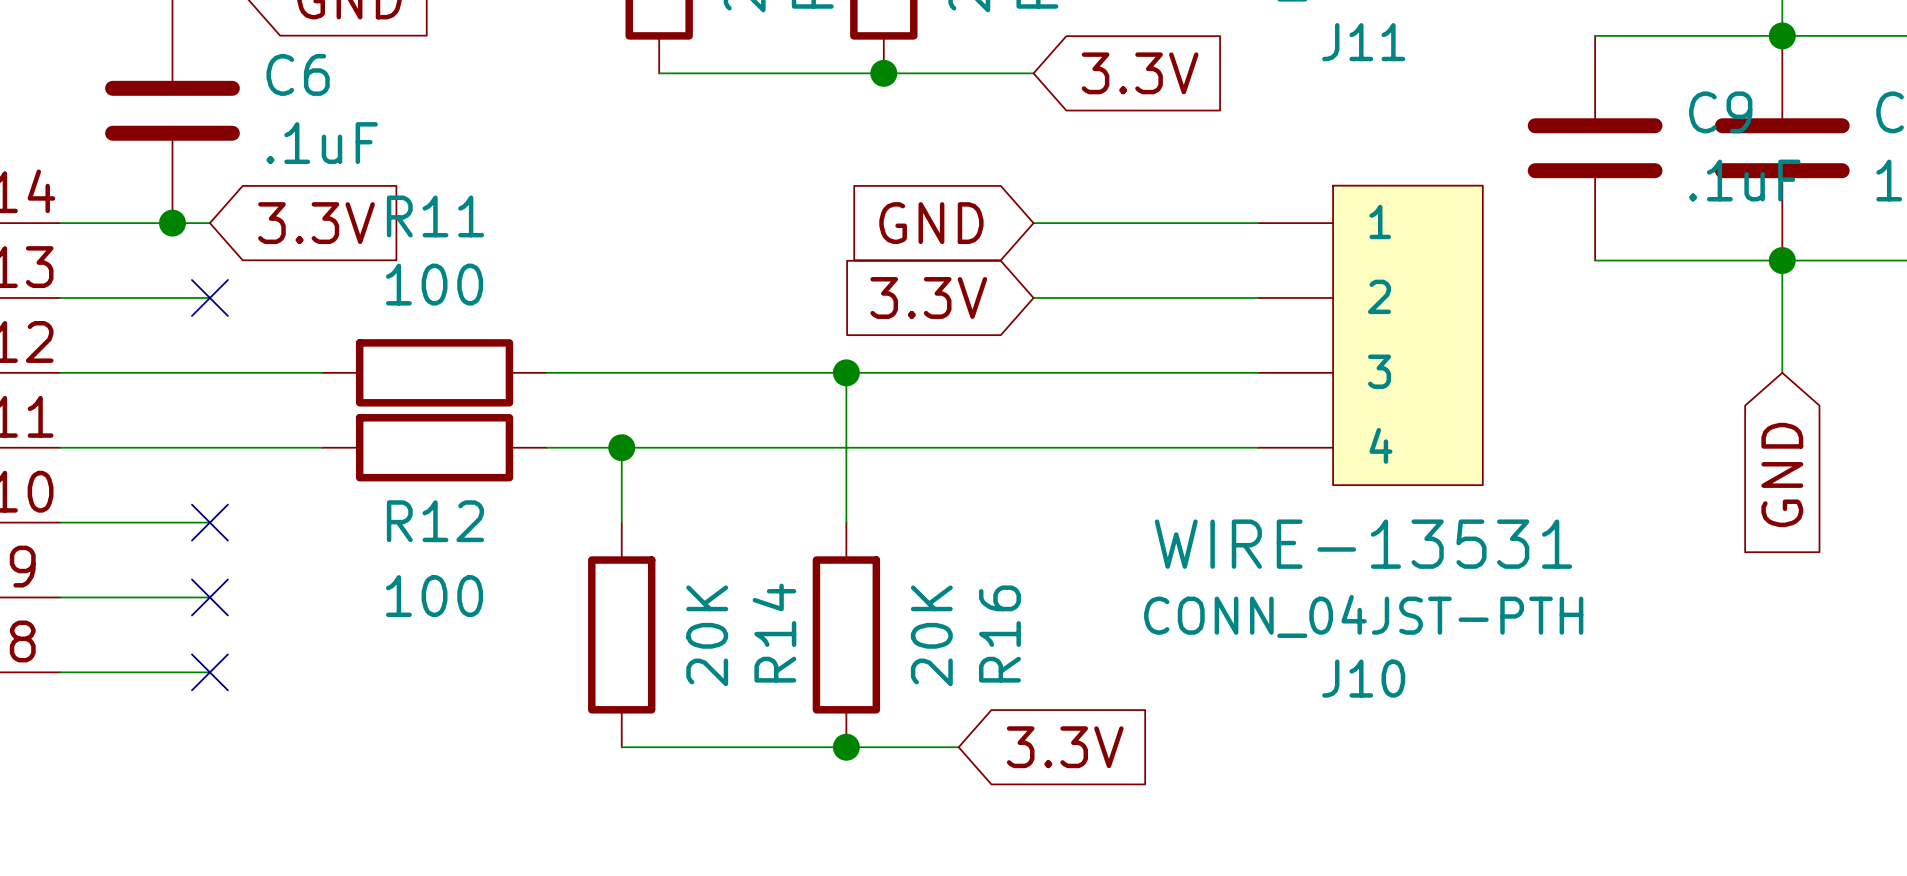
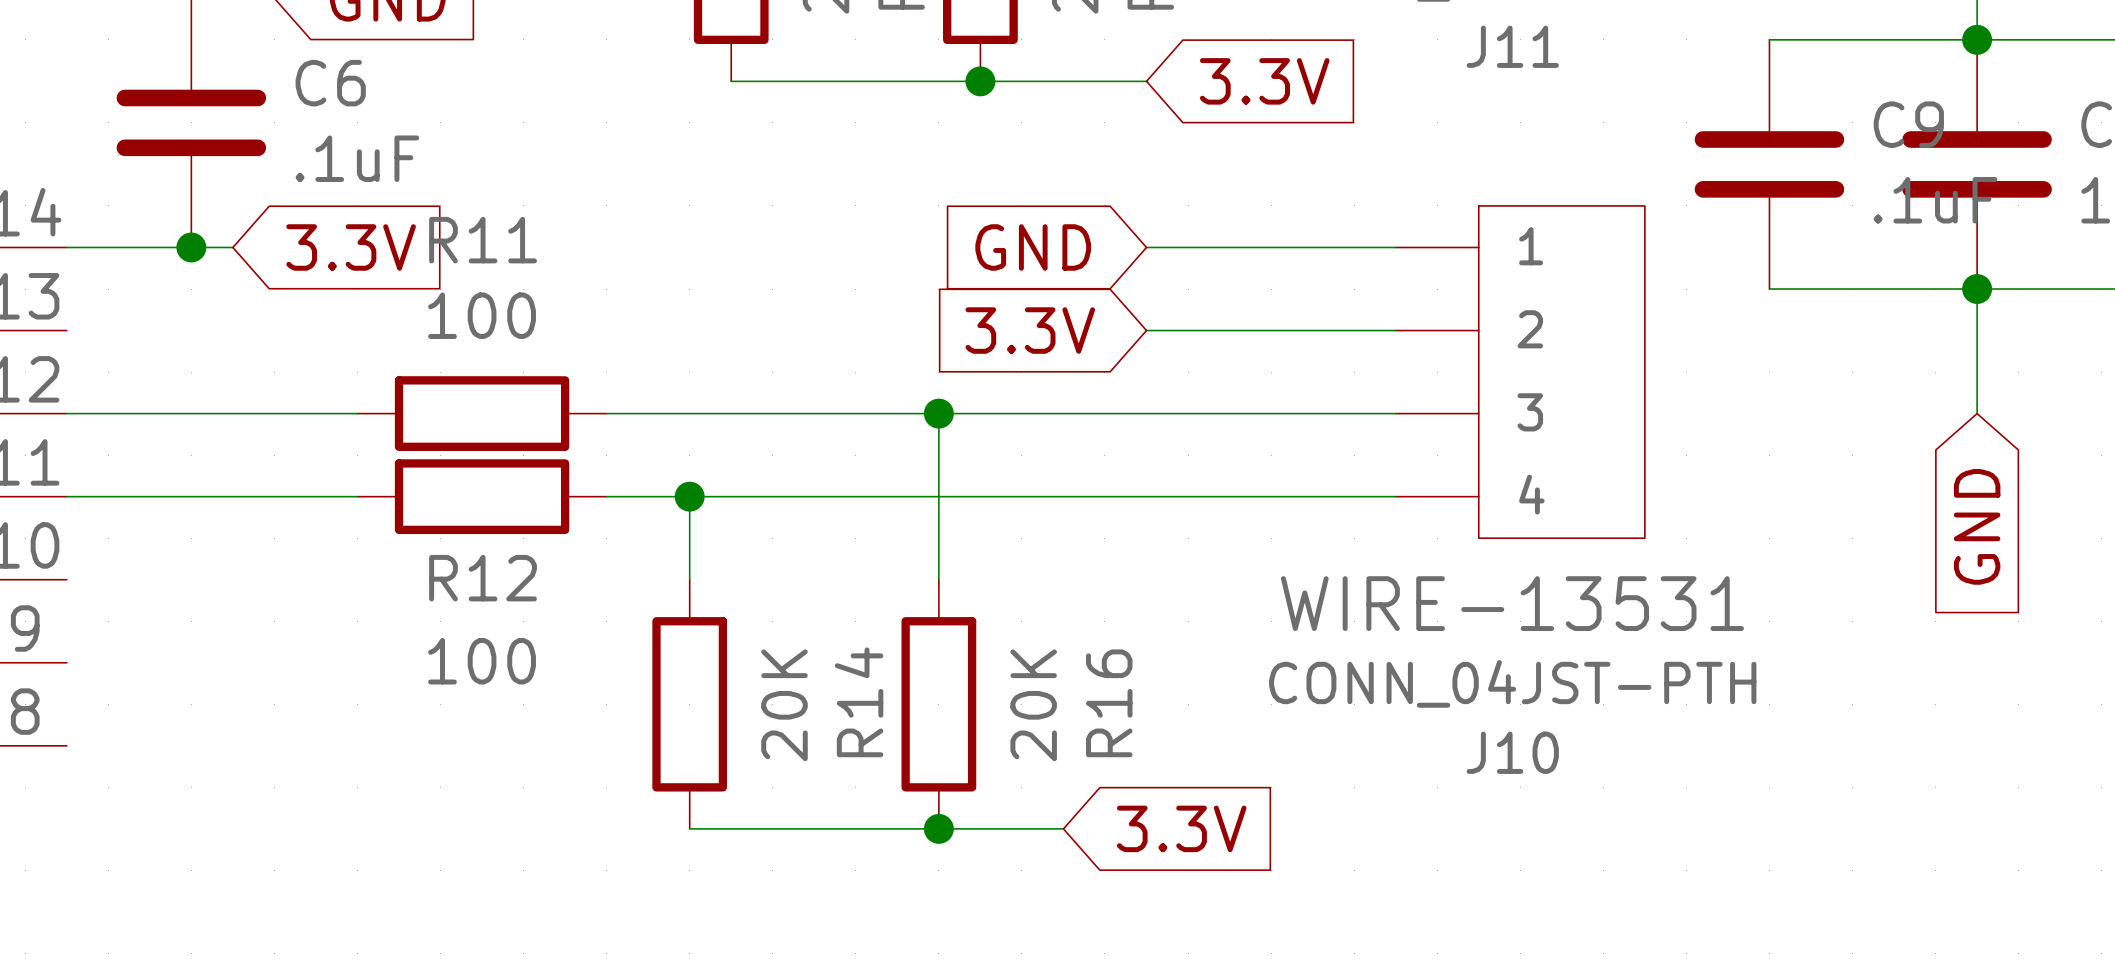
wire: (60, 297) (209, 297) -> none
no-connect mark: (209, 297) -> none
wire: (60, 522) (209, 522) -> none
no-connect mark: (209, 522) -> none
wire: (60, 597) (209, 597) -> none
no-connect mark: (209, 597) -> none
wire: (60, 672) (209, 672) -> none
no-connect mark: (209, 672) -> none

